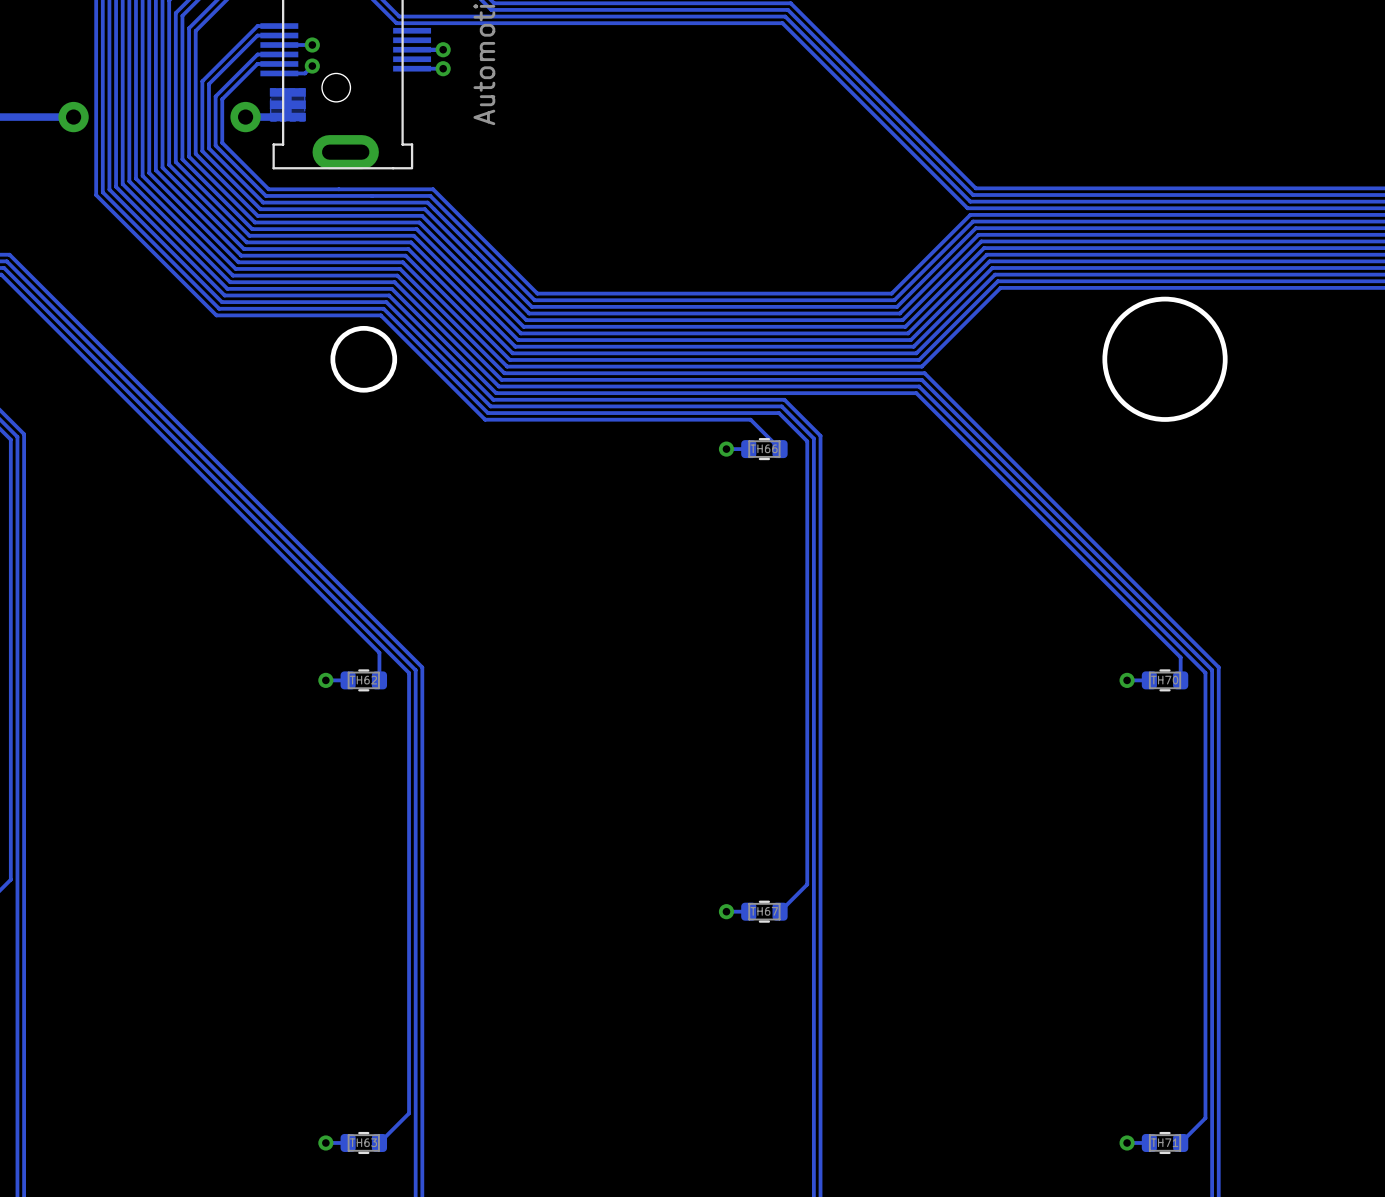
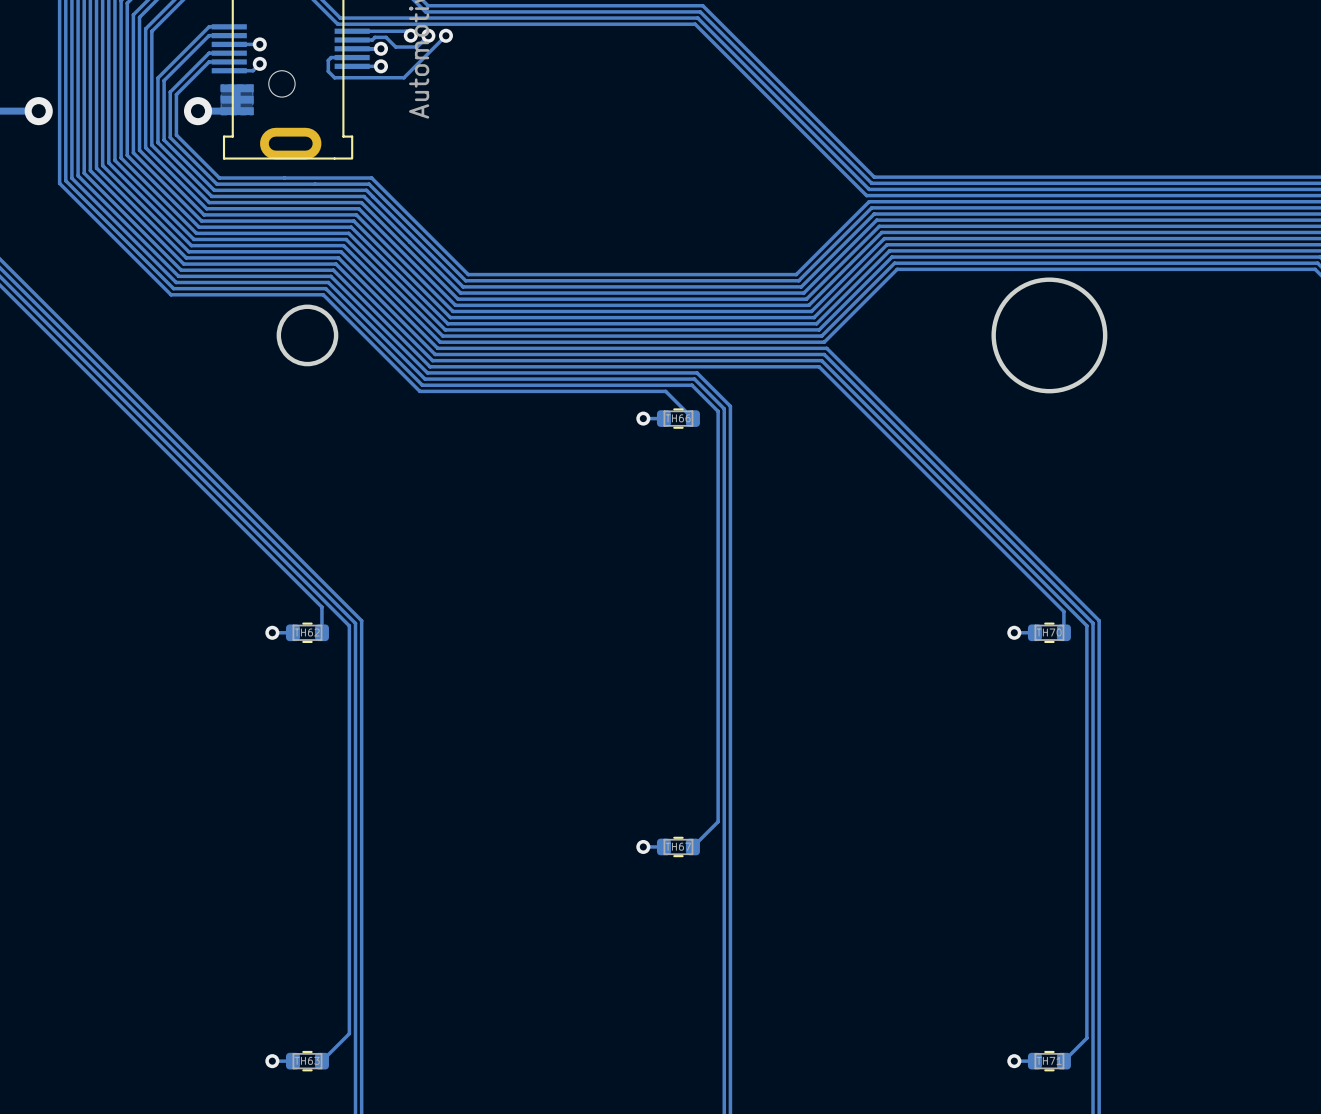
track: none -> (352, 31) (406, 31) (410, 35)
via: none -> (410, 35)
track: none -> (428, 35) (417, 47) (395, 47) (386, 37) (375, 37) (372, 40) (352, 40)
via: none -> (428, 35)
track: none -> (445, 35) (403, 77) (334, 77) (328, 71) (328, 60) (331, 57) (352, 57)
via: none -> (445, 35)

